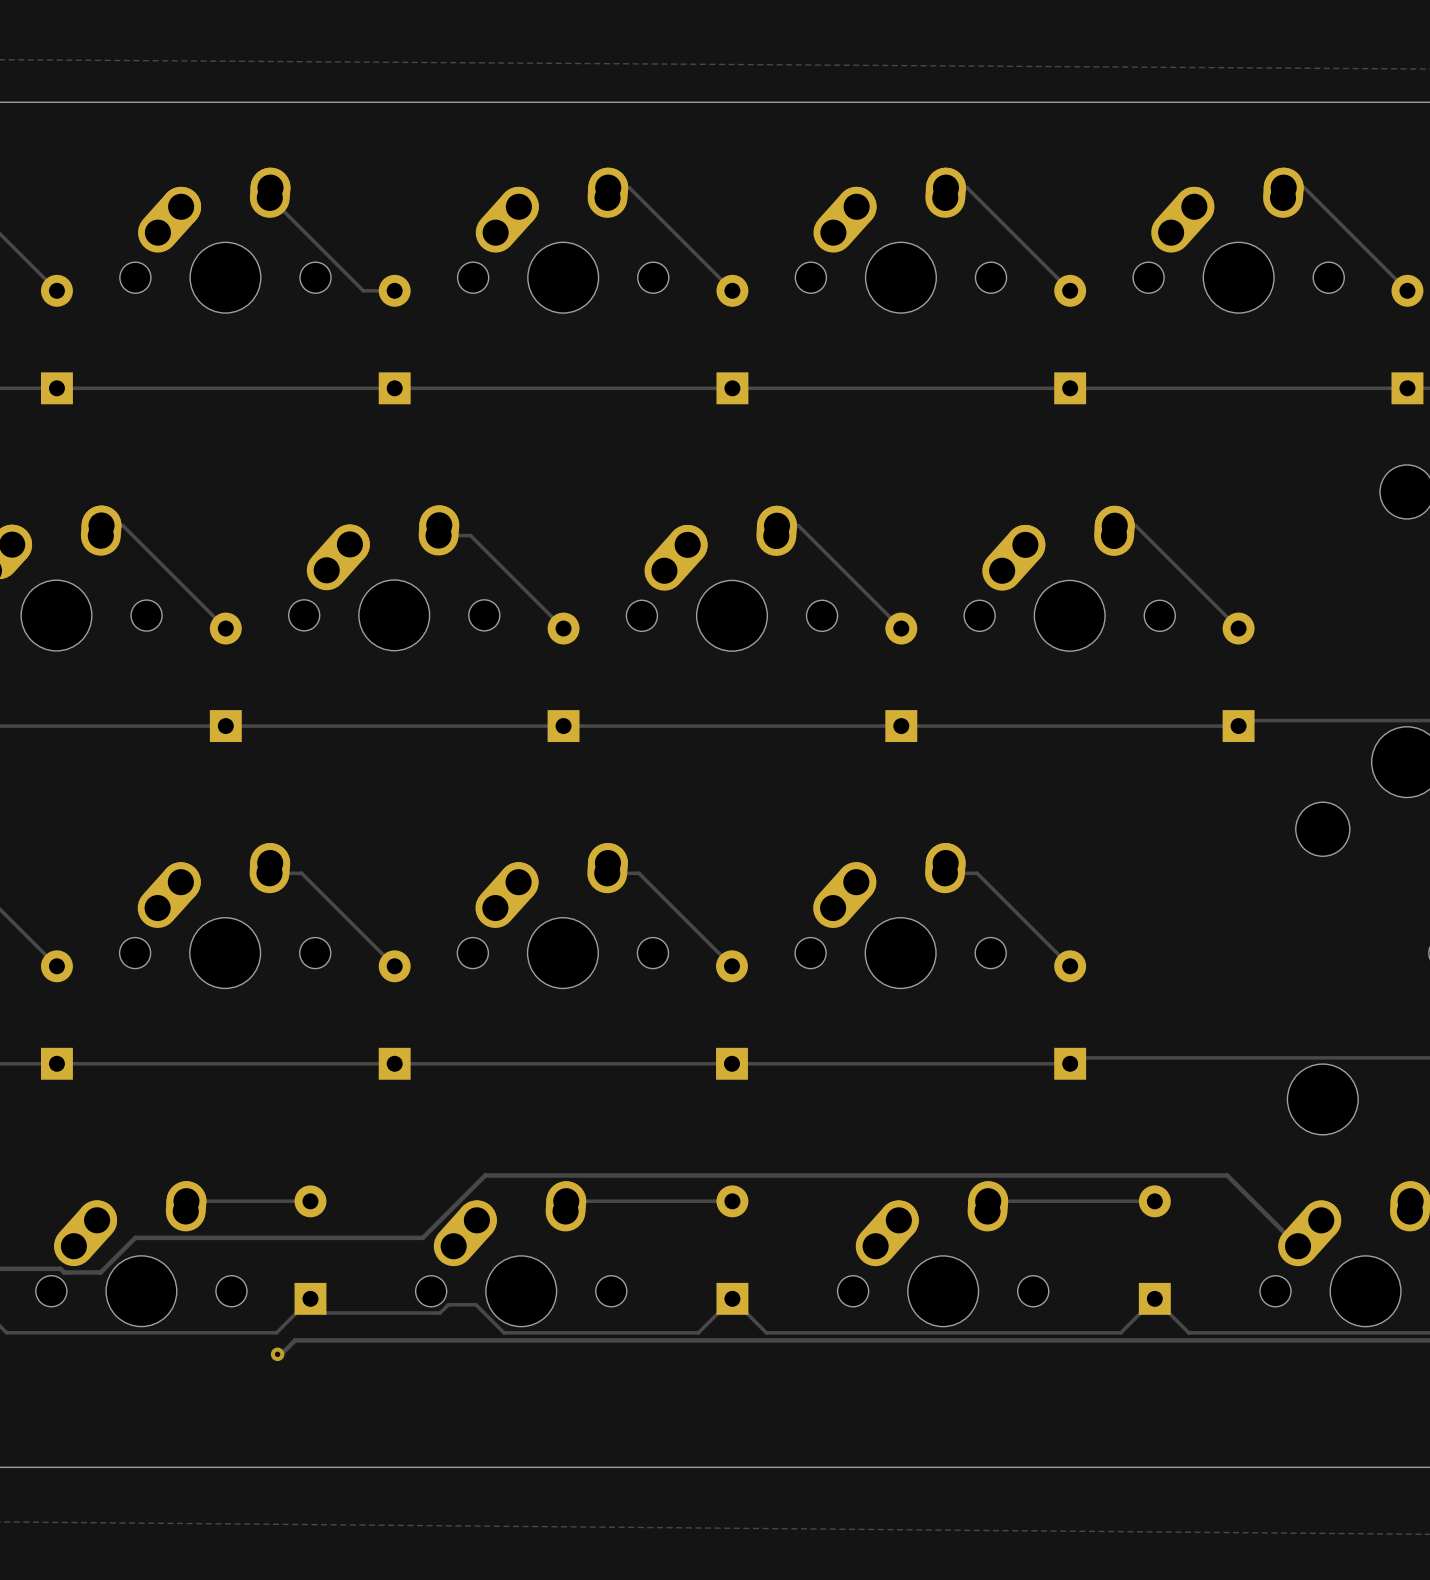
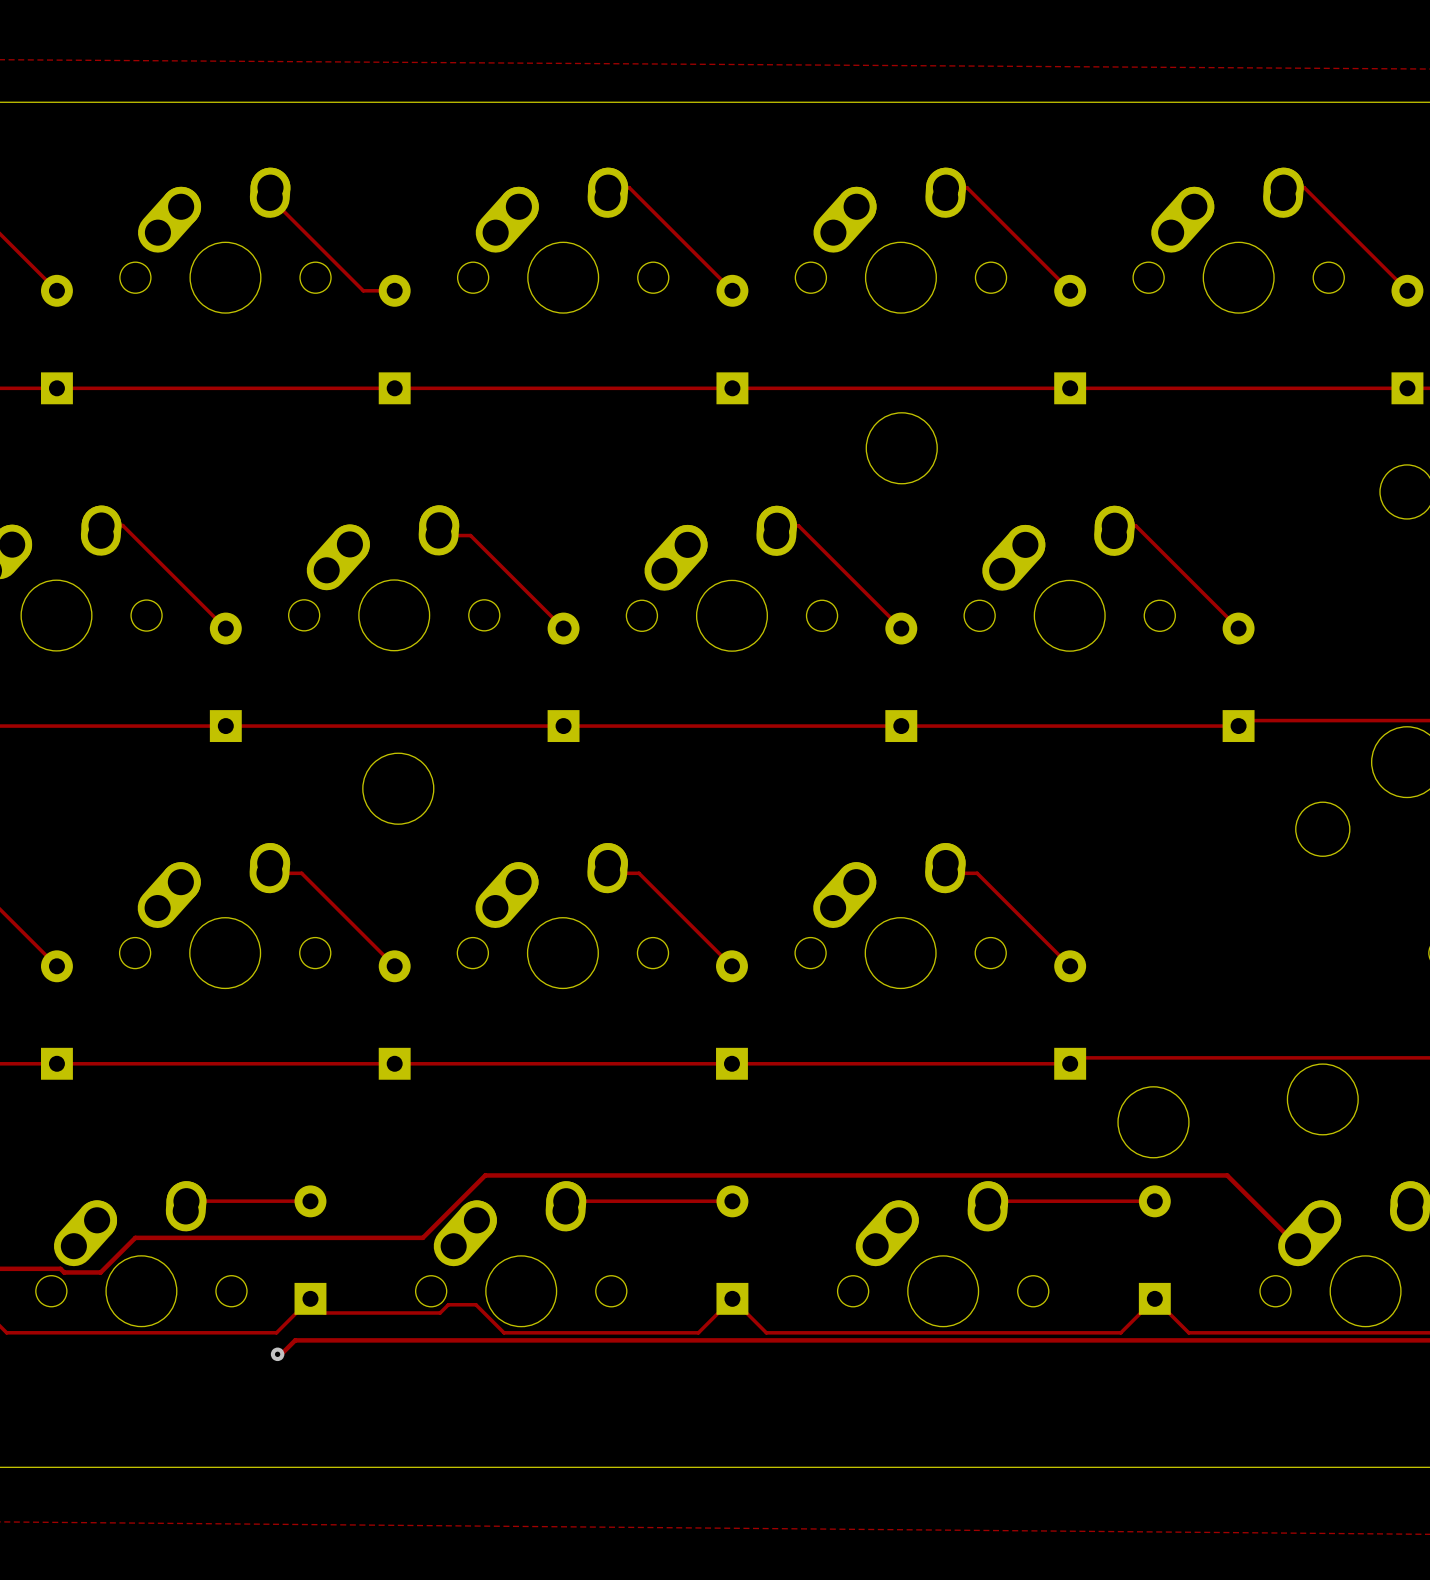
round board edge: none -> [865, 412, 938, 485]
round board edge: none -> [362, 752, 435, 825]
round board edge: none -> [1117, 1086, 1190, 1159]

